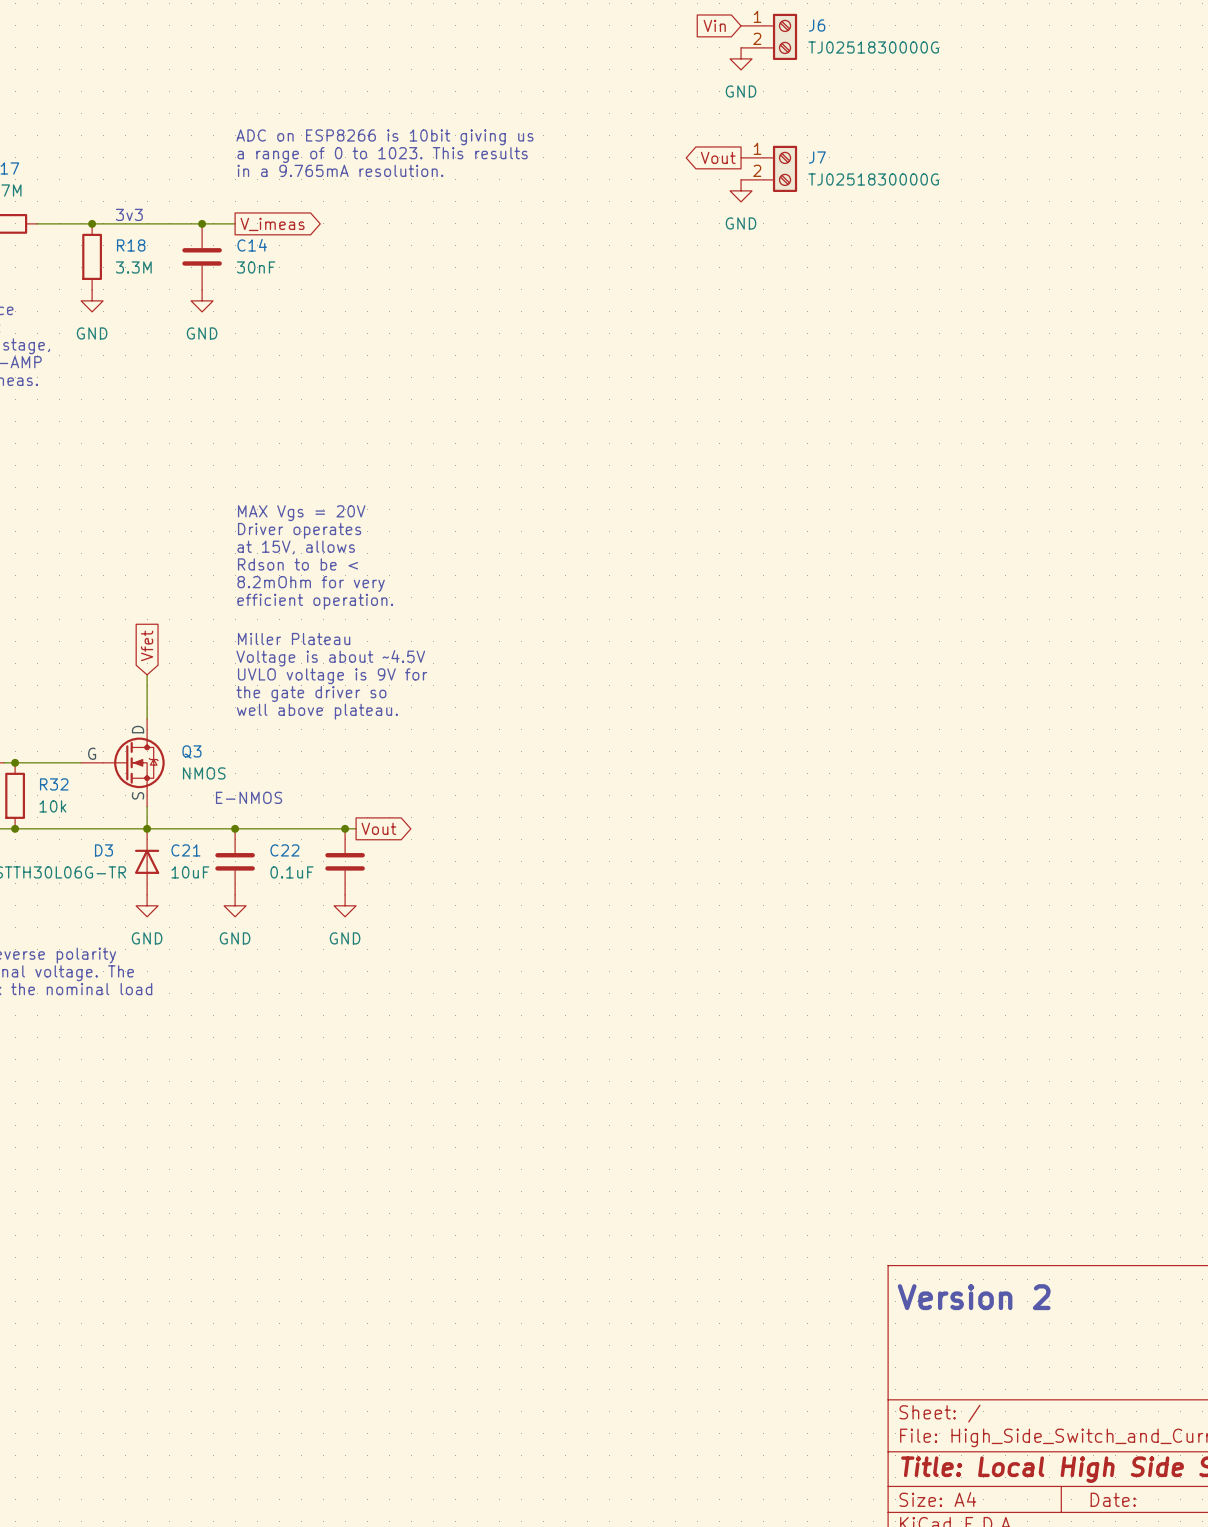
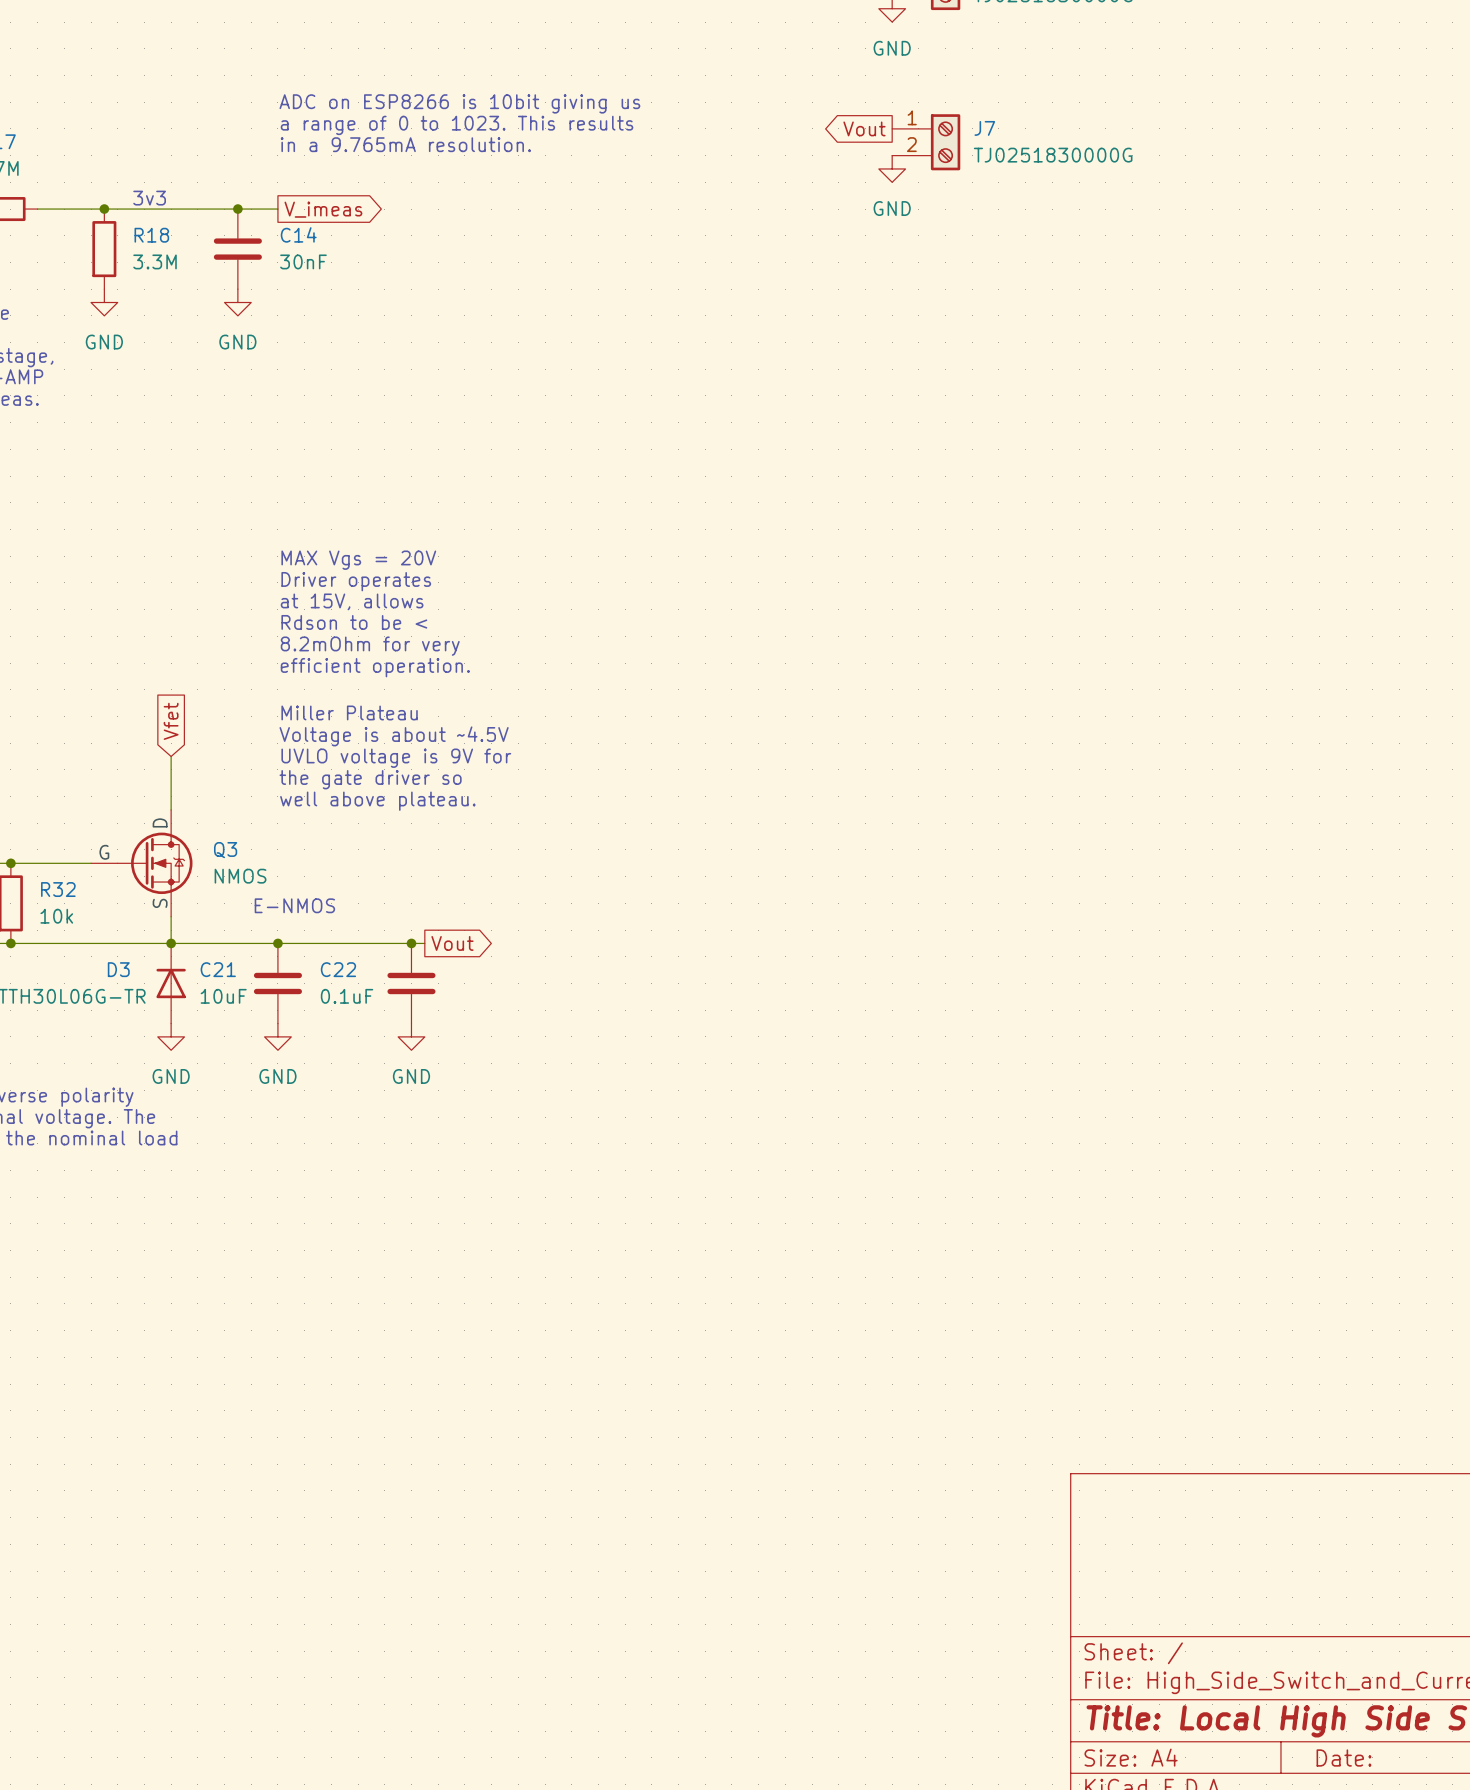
text: Version 2 (974, 1297) -> none

